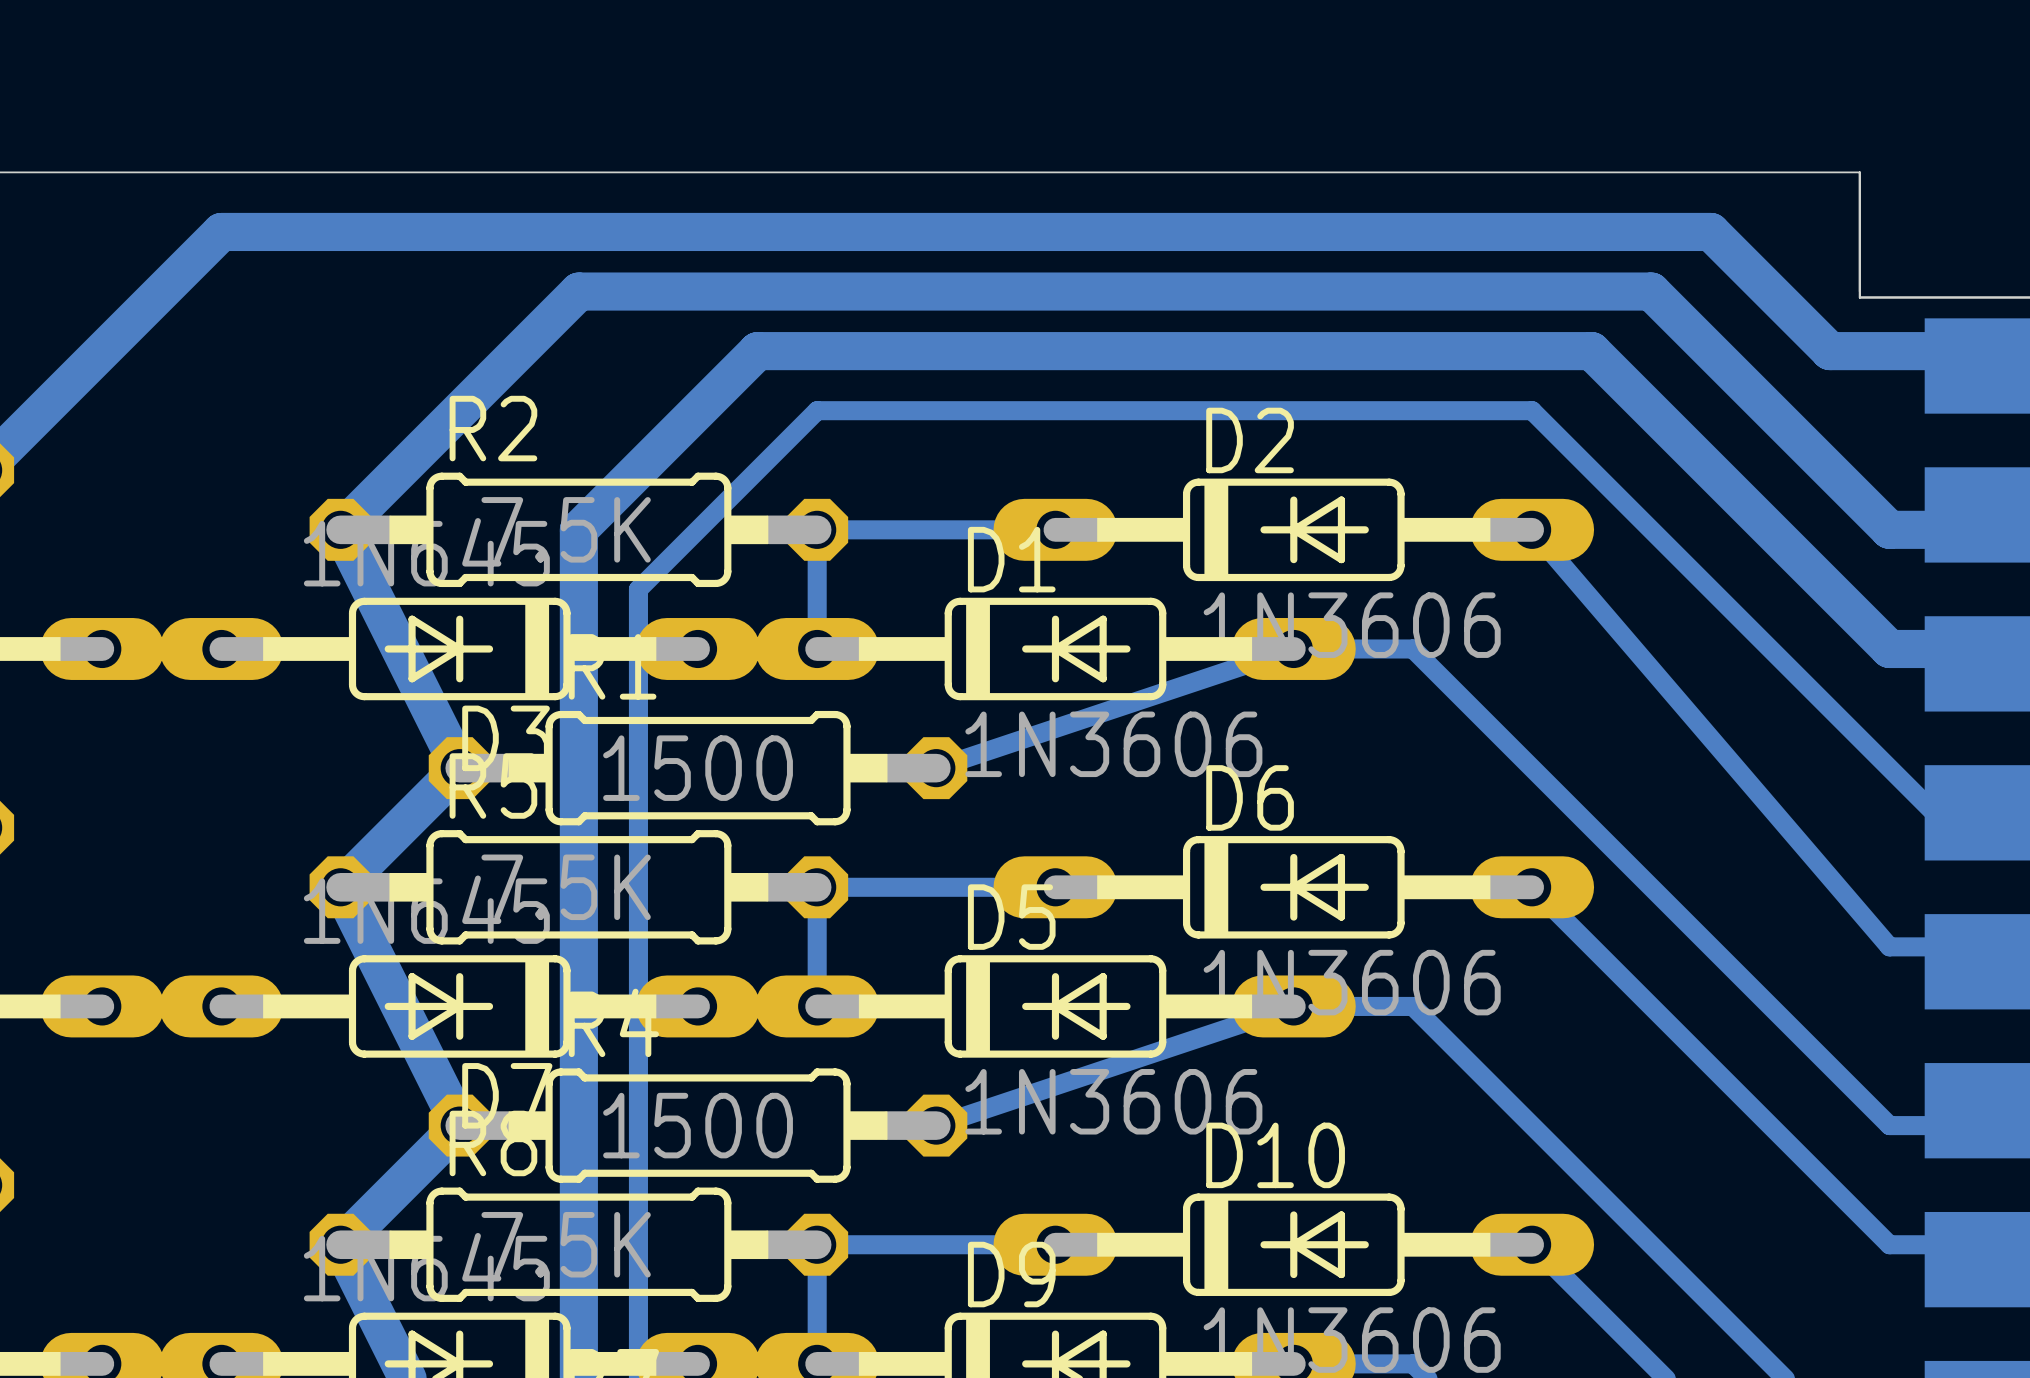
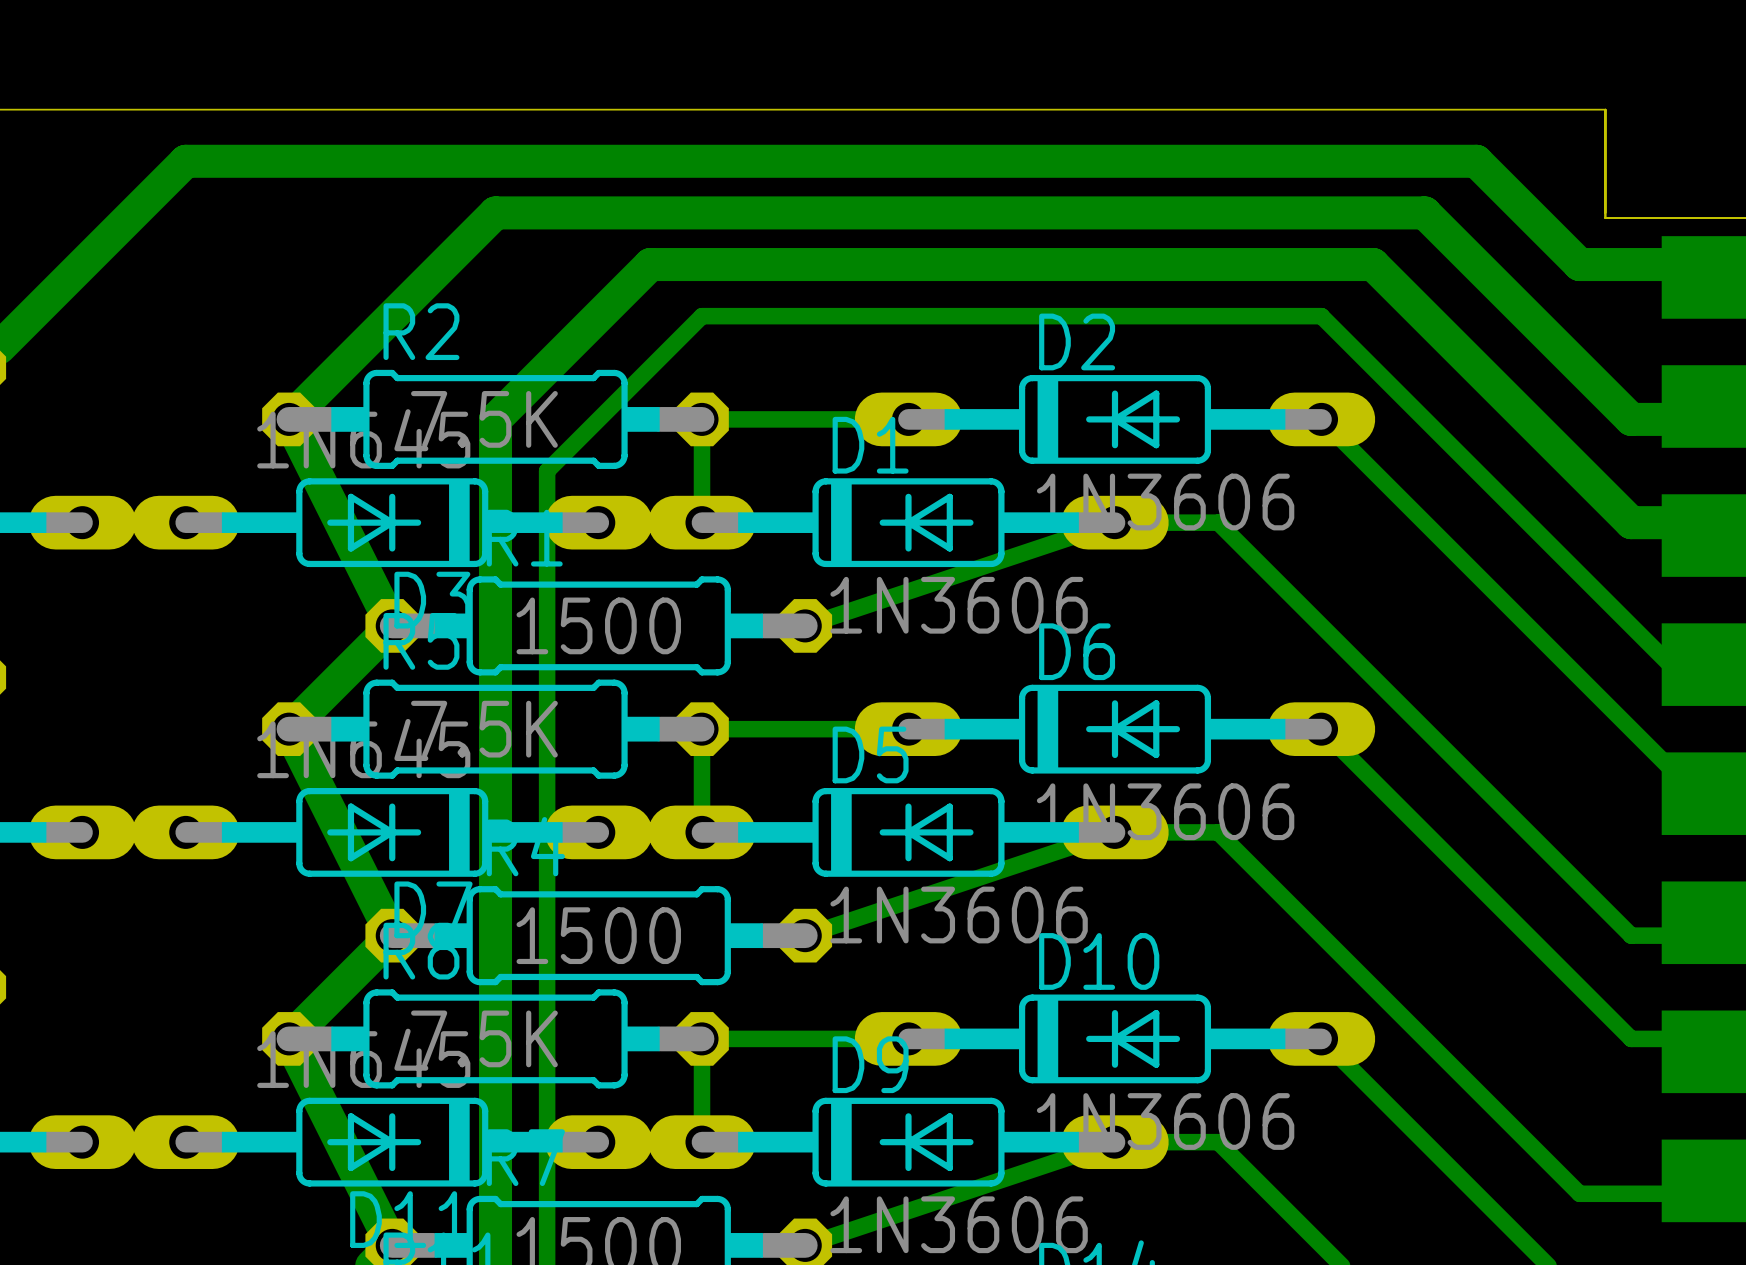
bottom track: (1532, 529) (1889, 946) (1949, 946) -> (1321, 419) (1682, 780)

